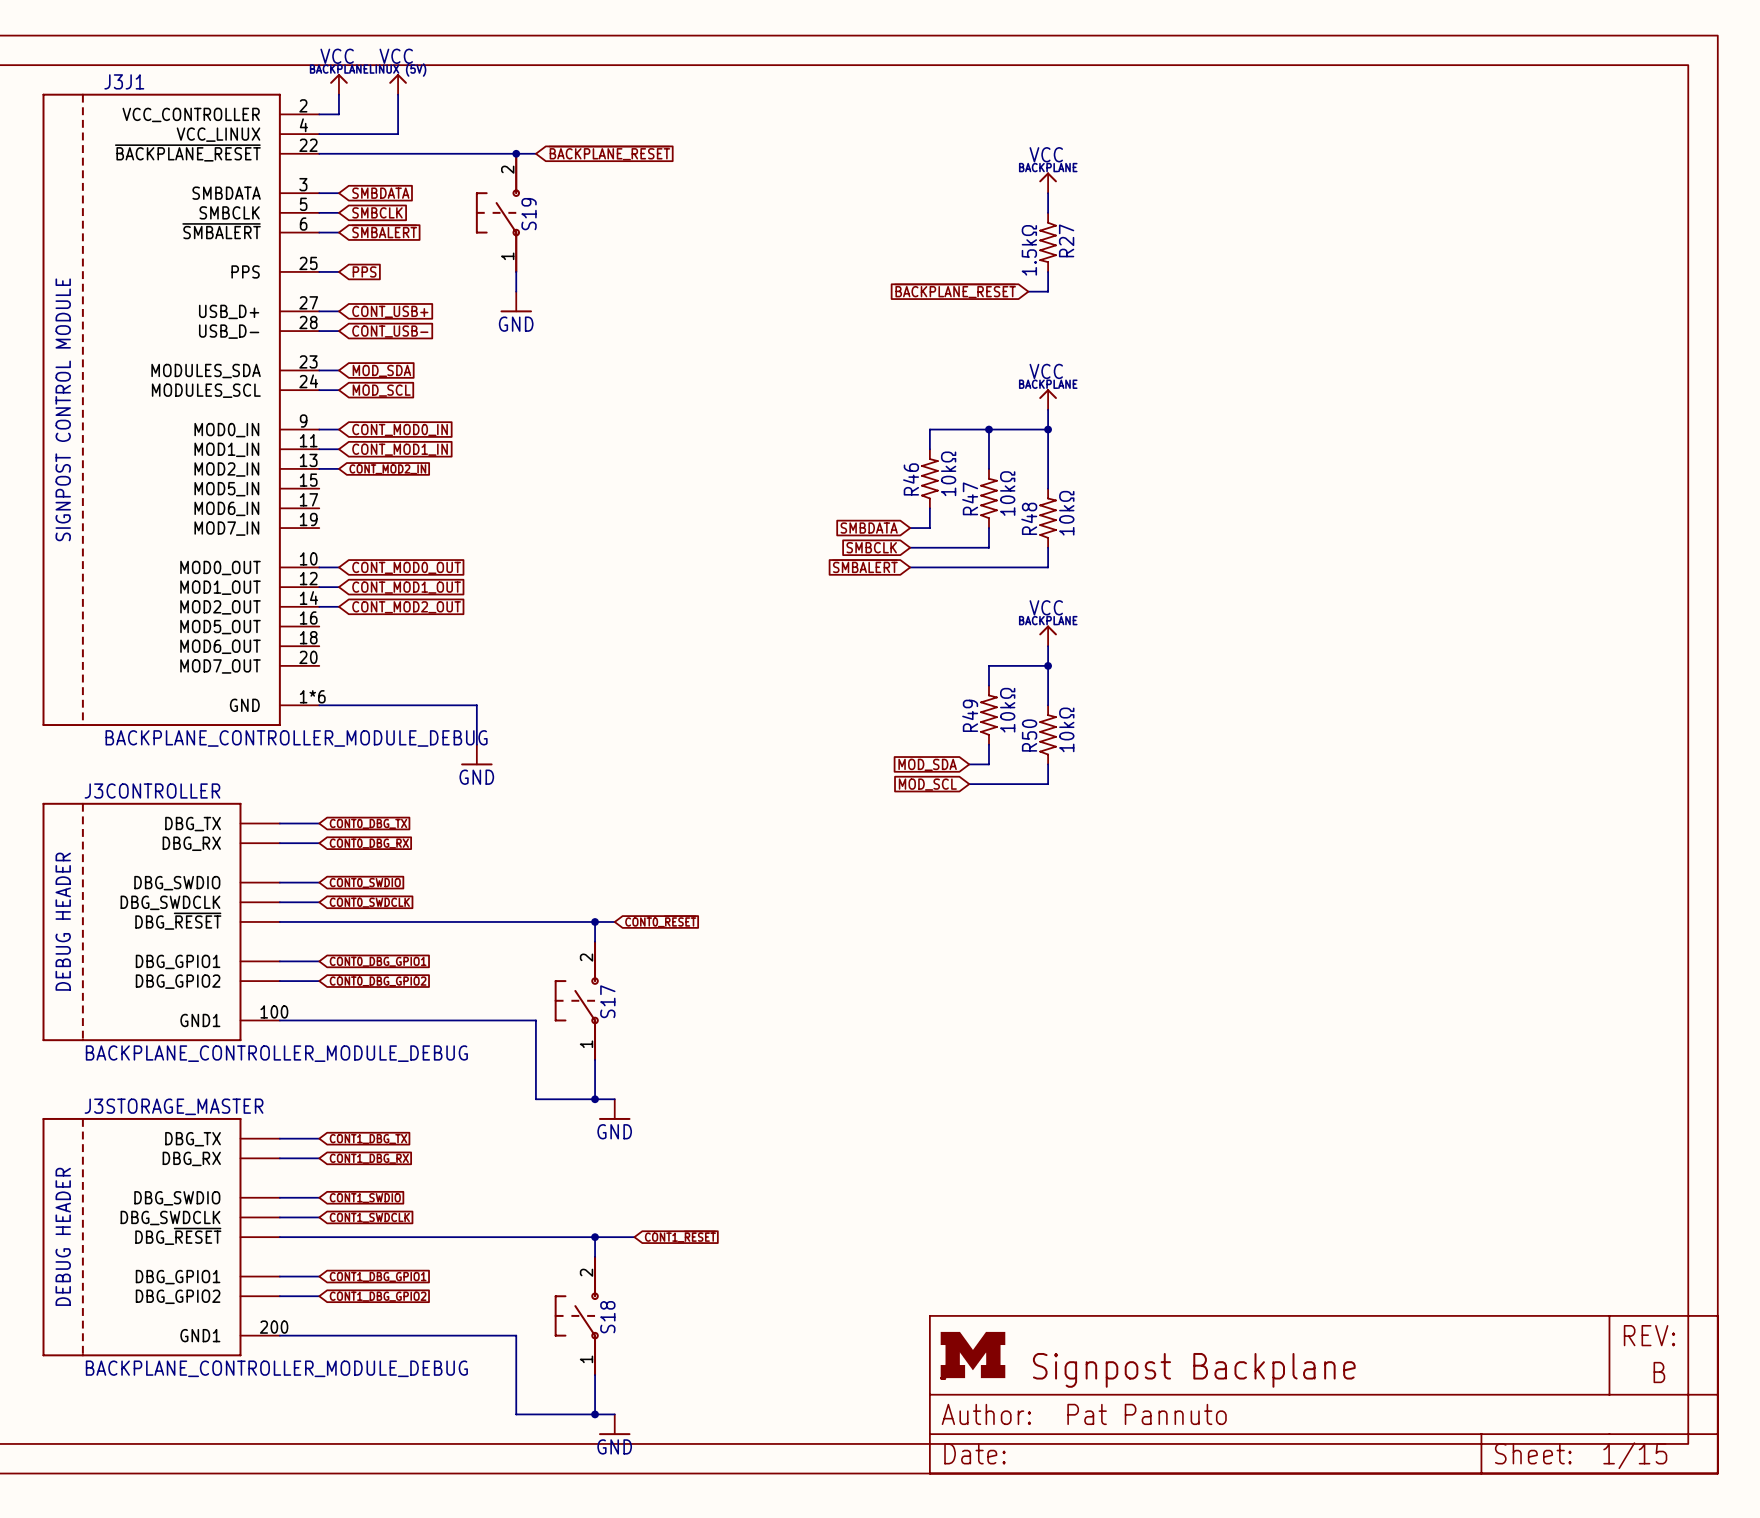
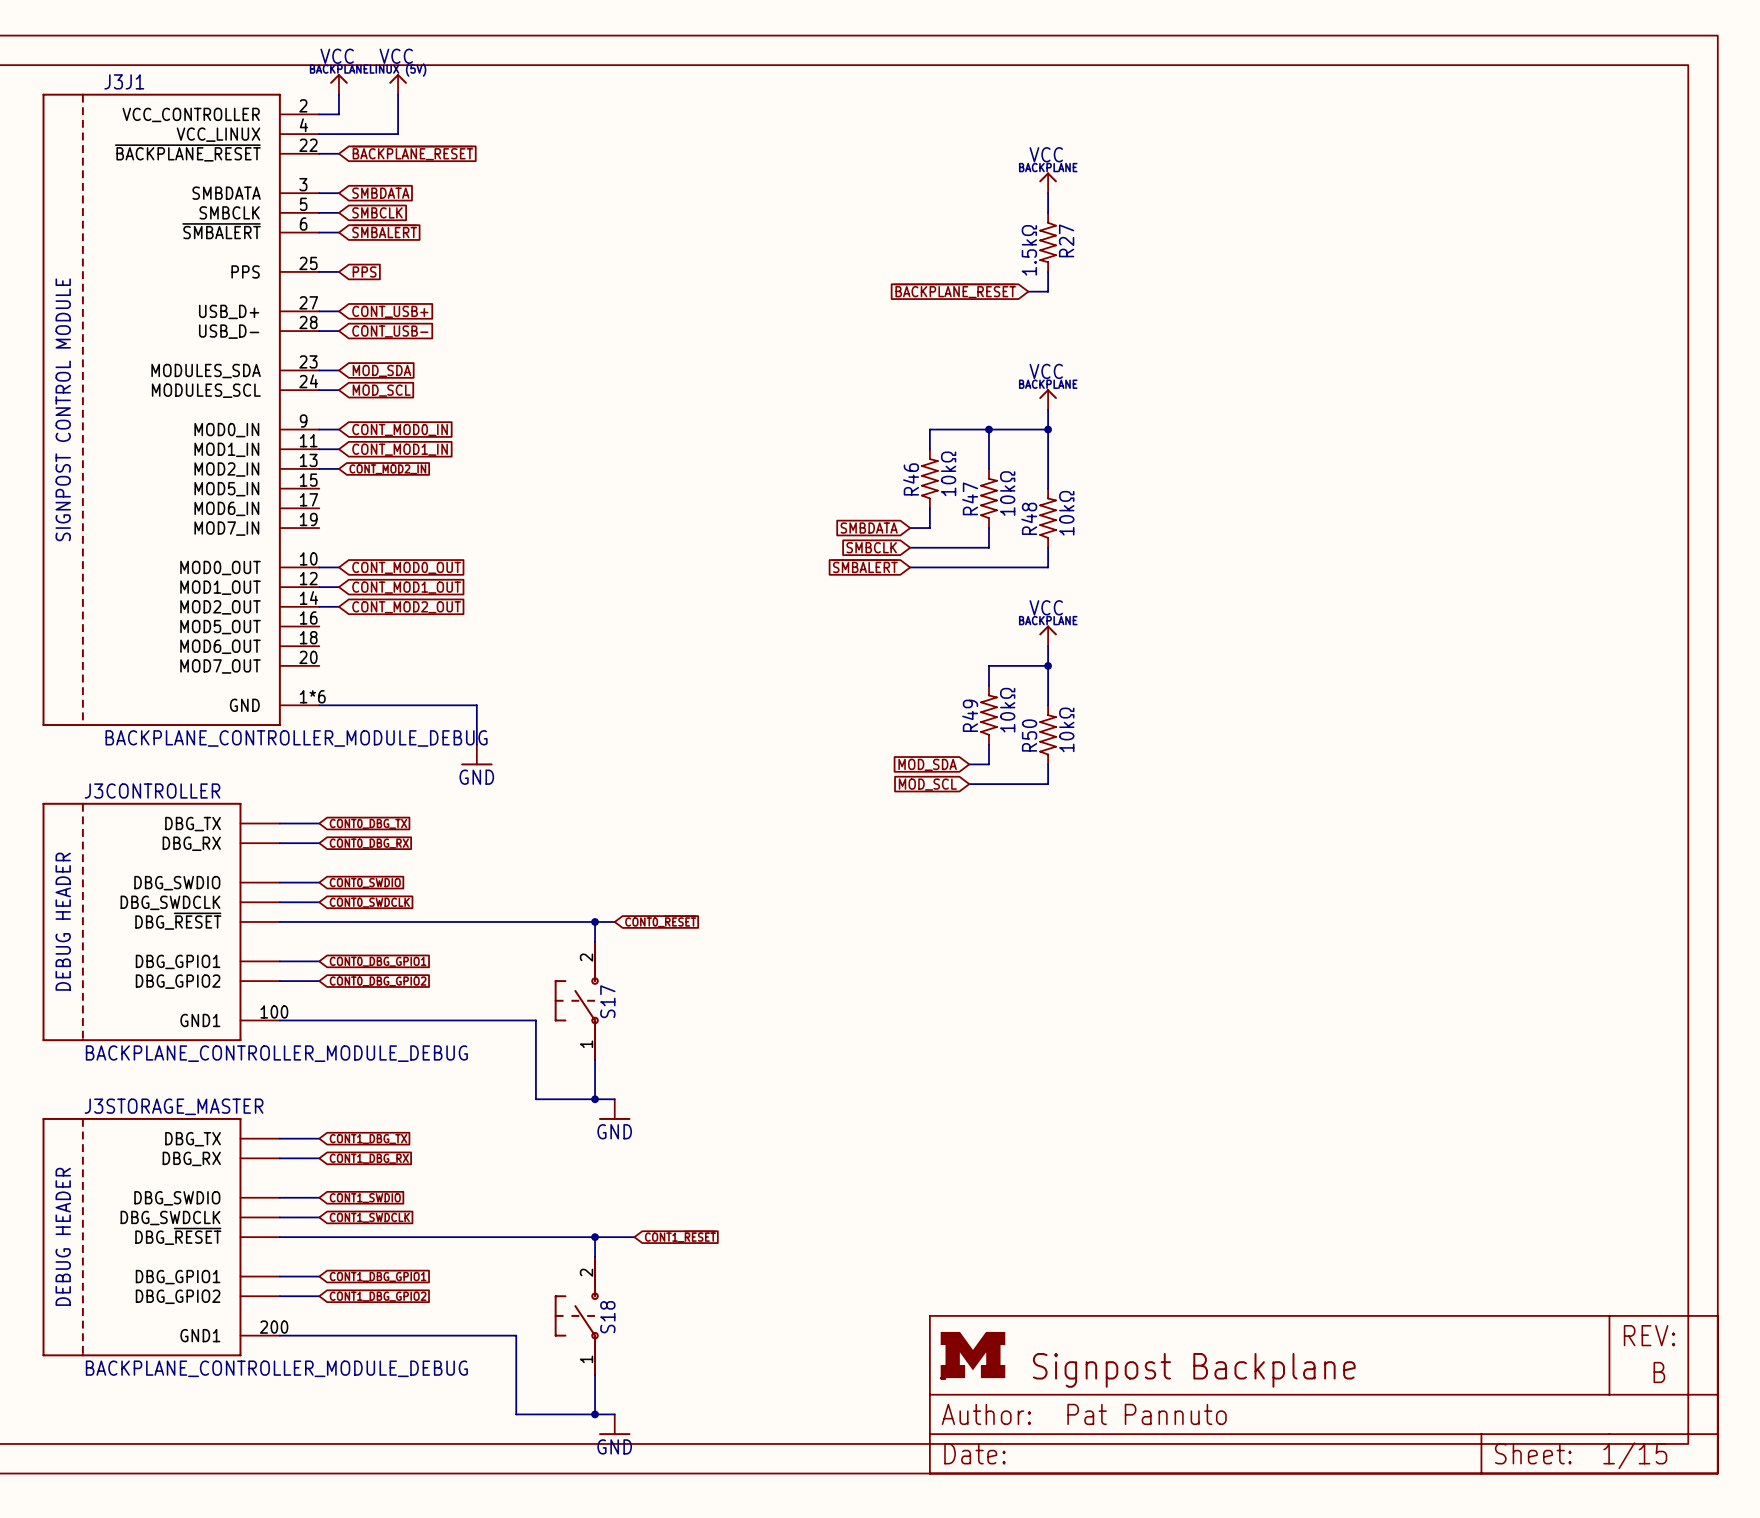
wire: (338, 153) (535, 153) -> none
global label: none -> ~{BACKPLANE_RESET} (412, 153)
junction: (516, 153) -> none
global label: ~{BACKPLANE_RESET} (609, 153) -> none
S19: (497, 212) -> none
wire: (516, 271) (516, 291) -> none
power symbol: GND (516, 302) -> none

